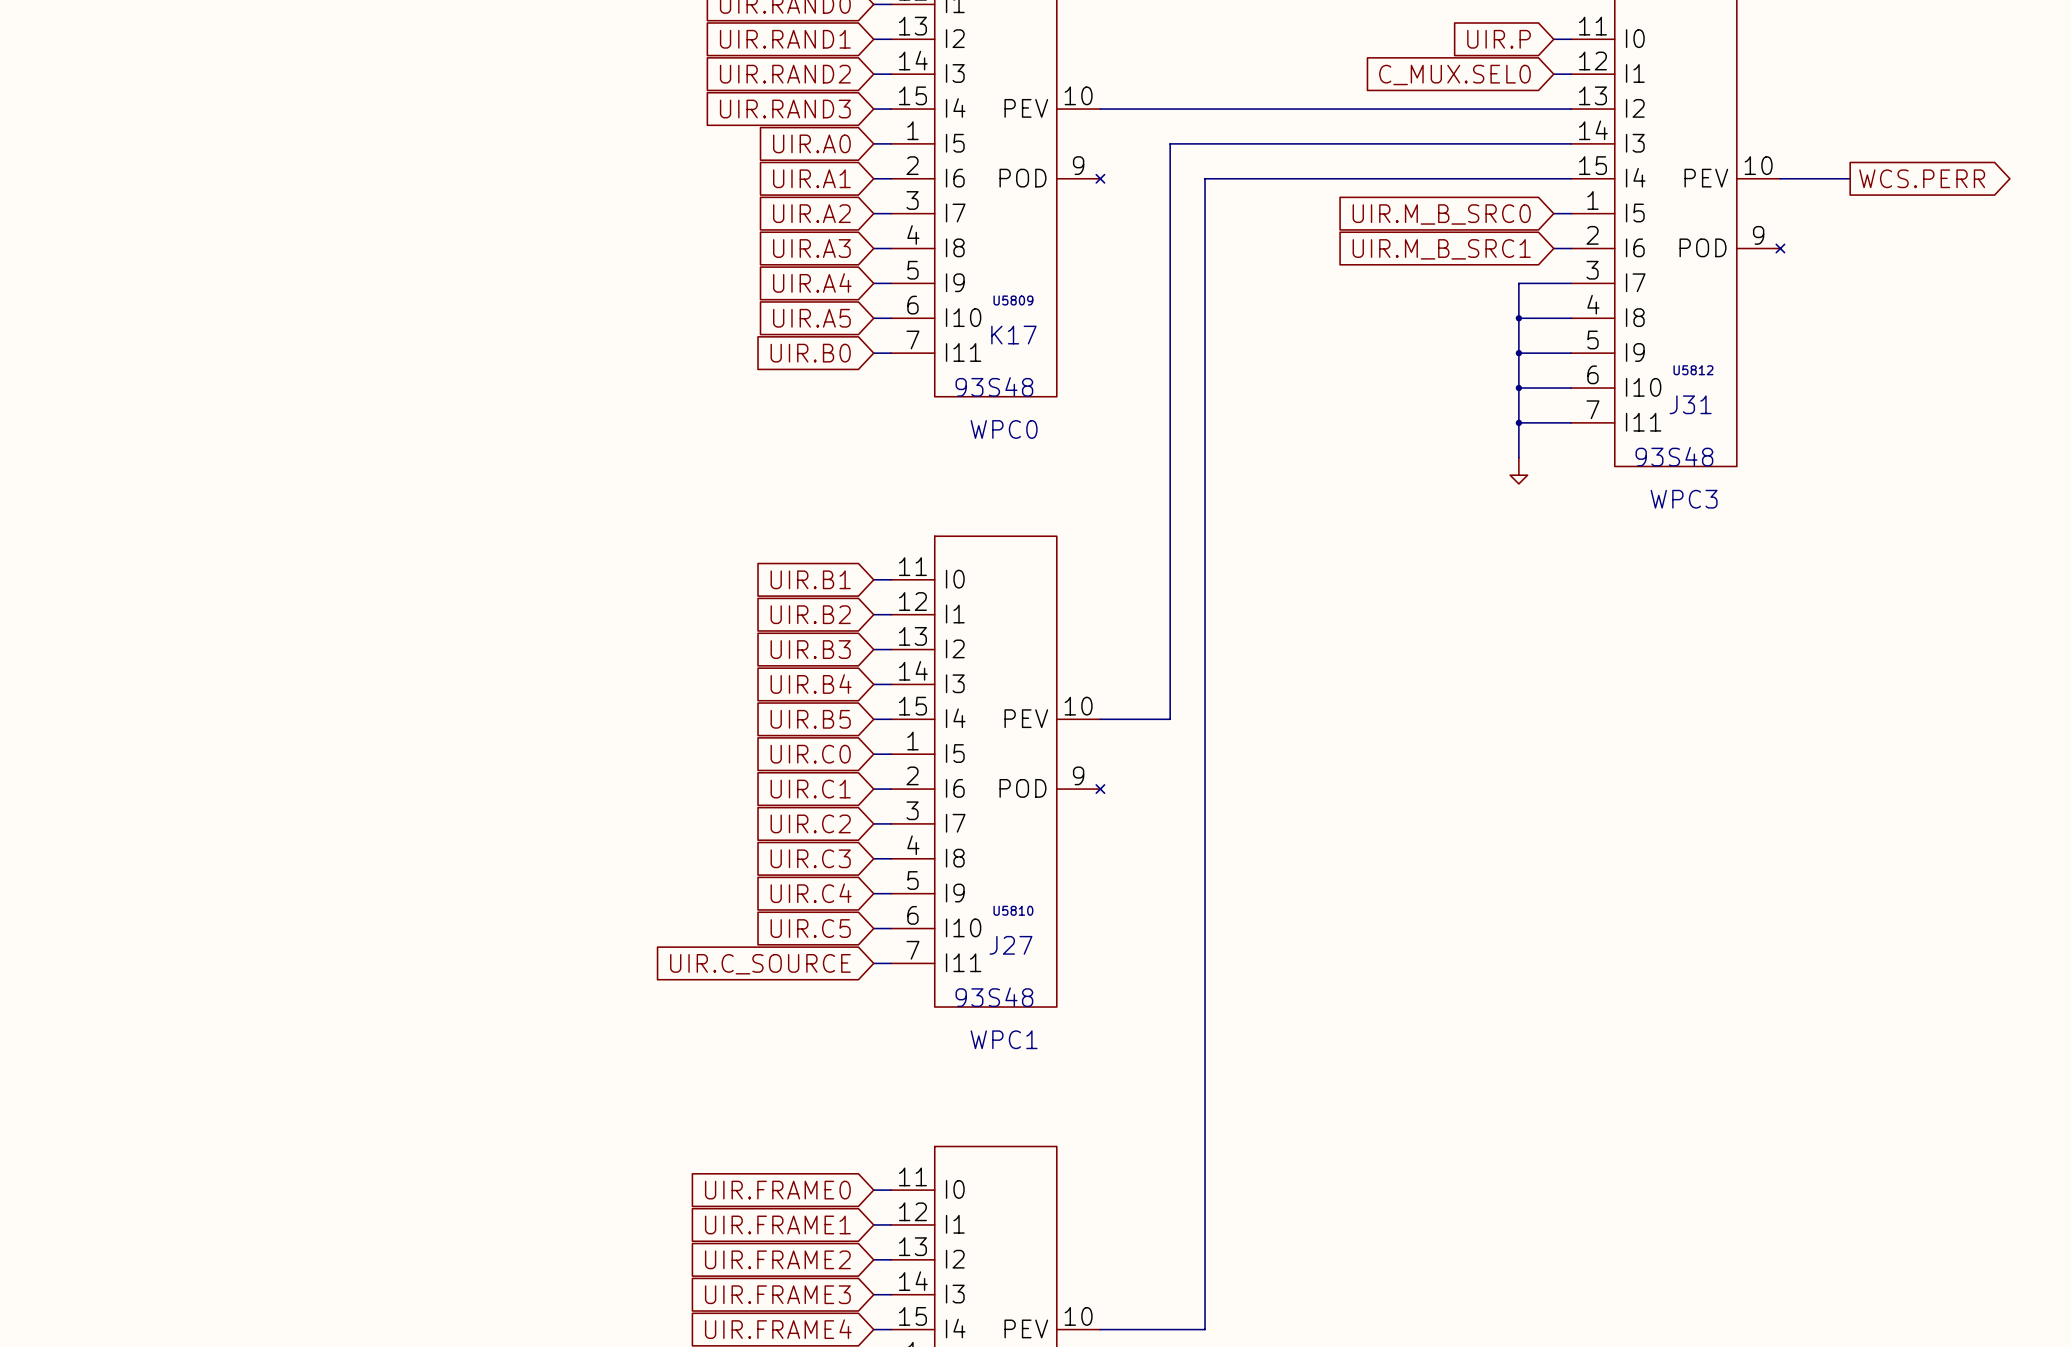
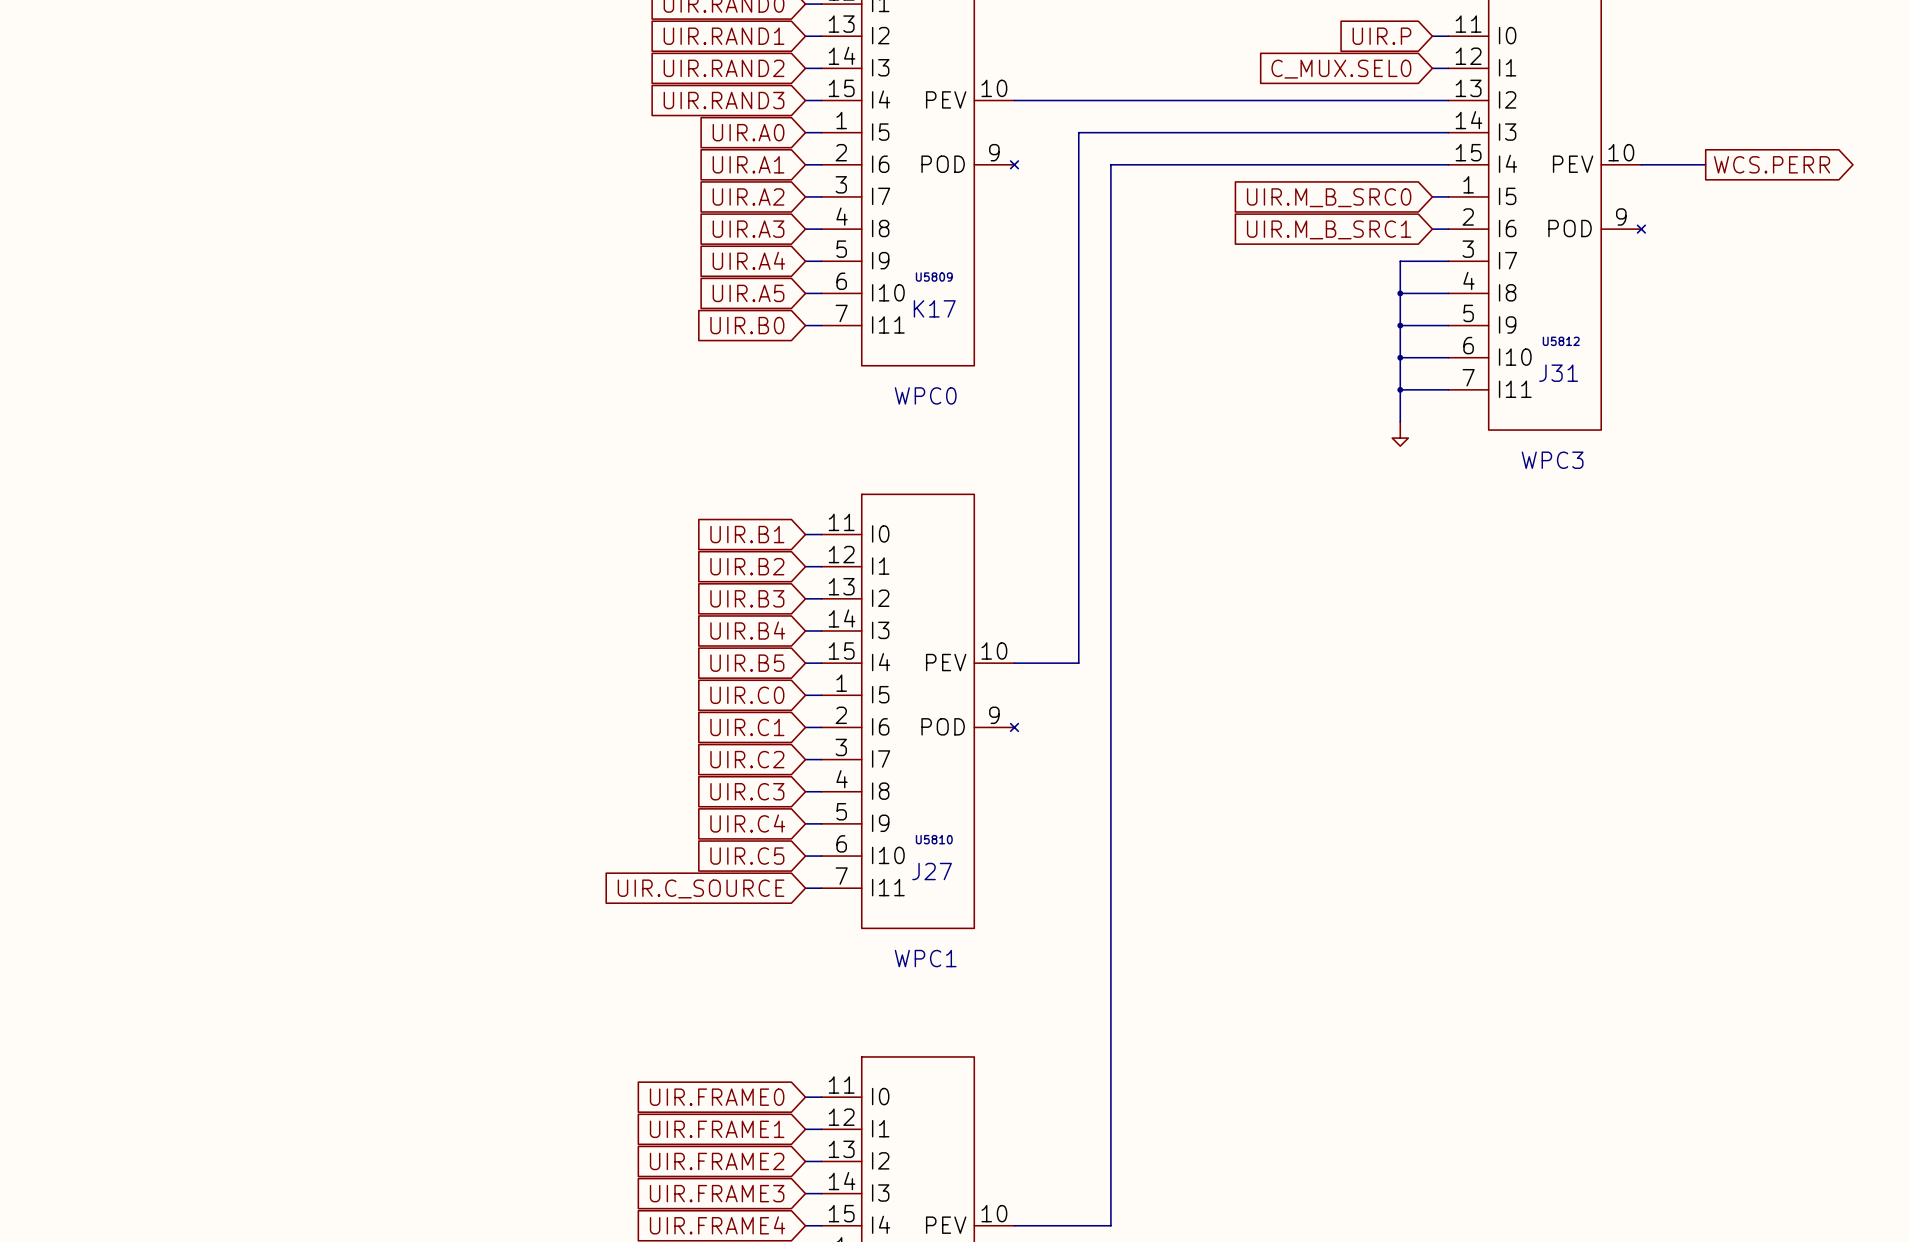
U5809 value: 93S48 (994, 386) -> none
U5812 value: 93S48 (1674, 456) -> none
U5810 value: 93S48 (994, 997) -> none

